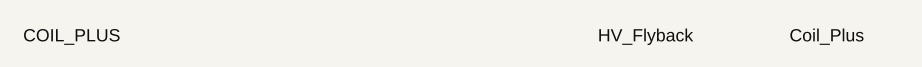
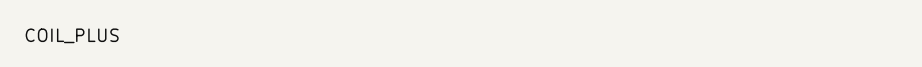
label: HV_Flyback (646, 36) -> none
label: Coil_Plus (826, 36) -> none

